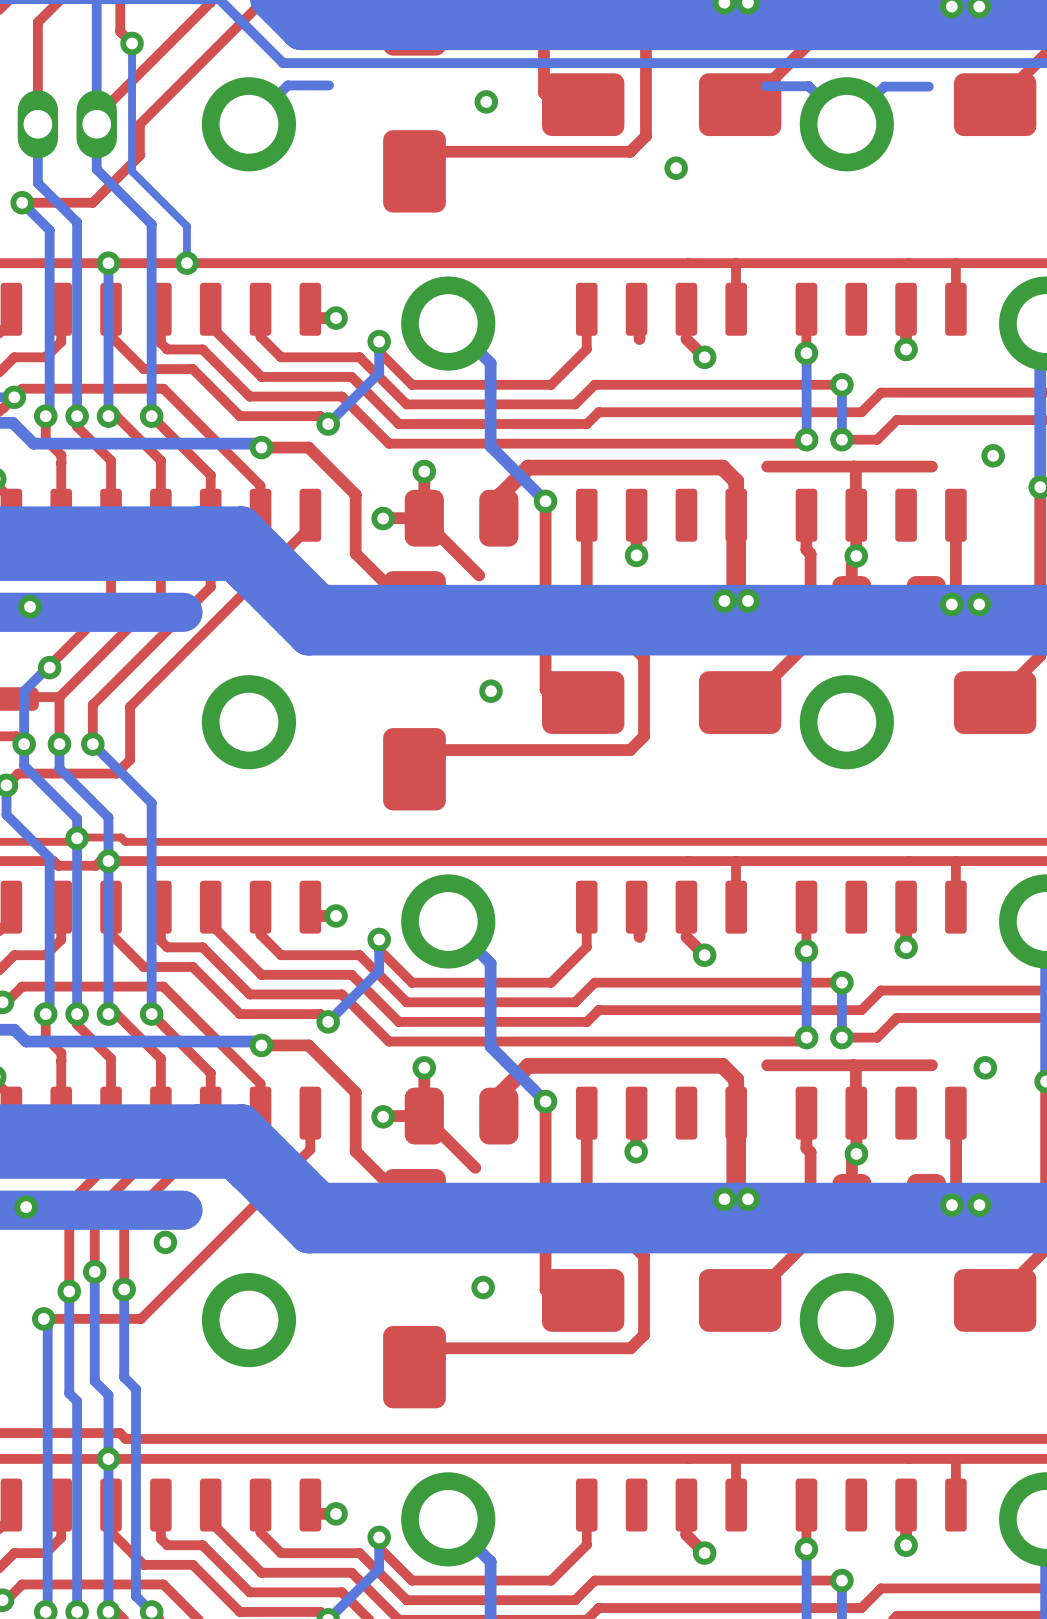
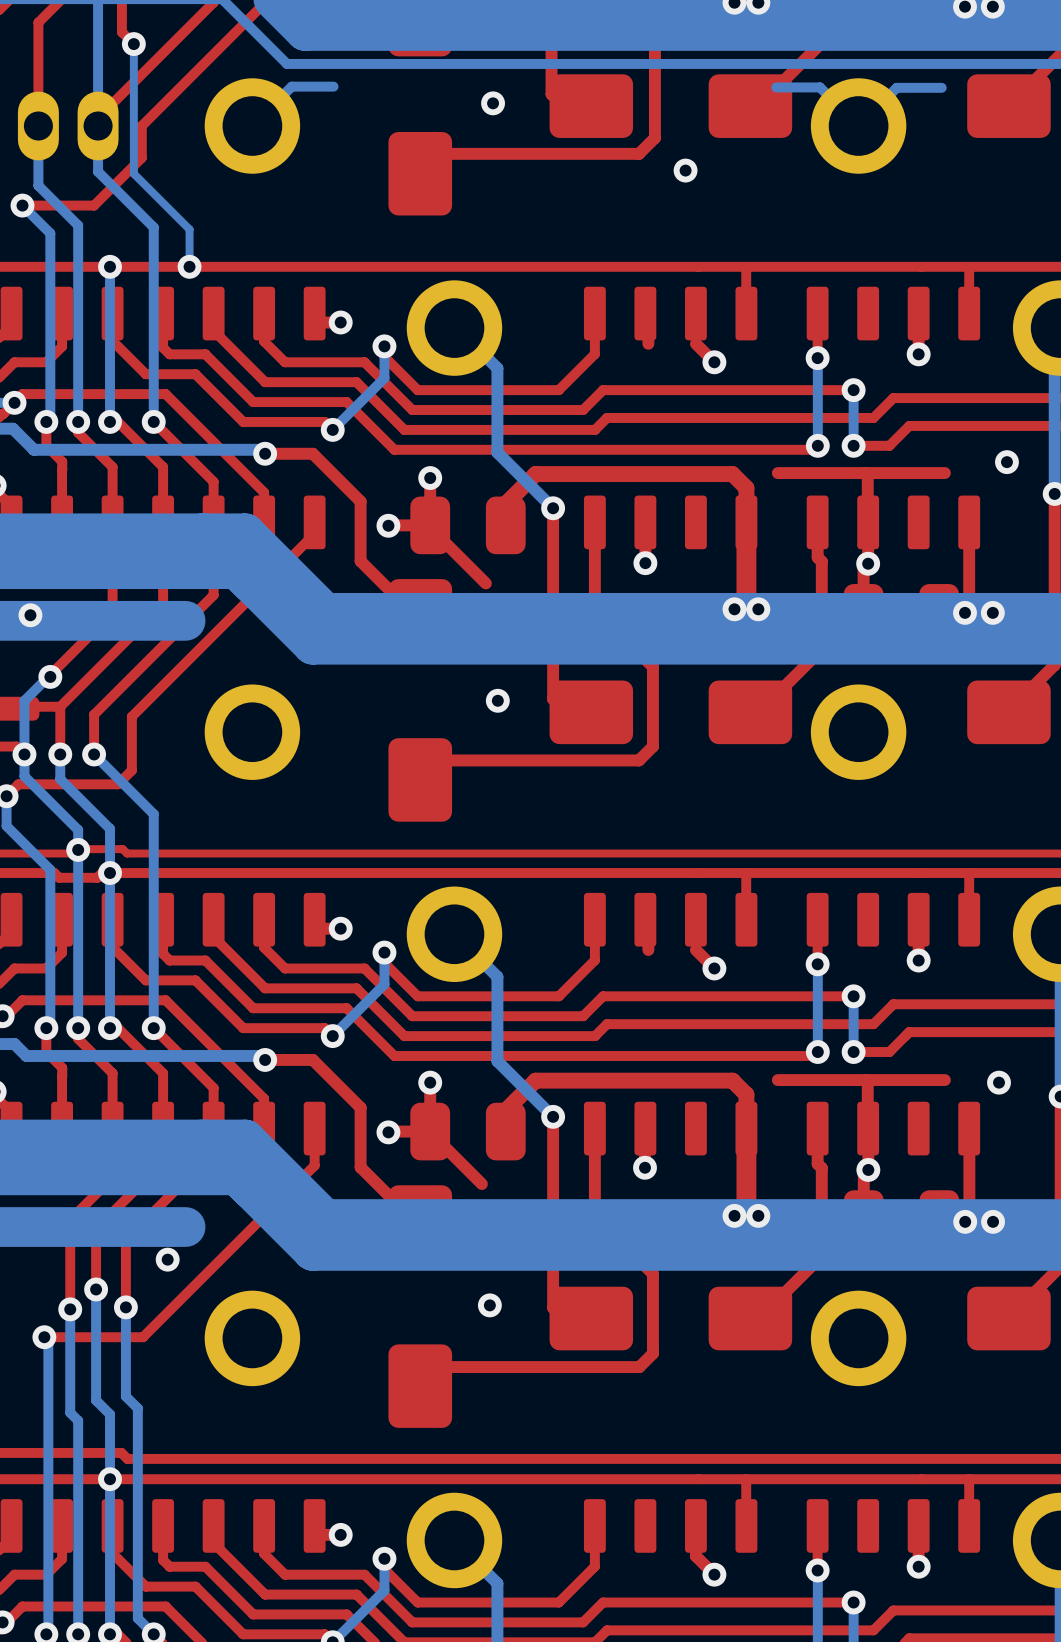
via: (26, 1207) -> none

